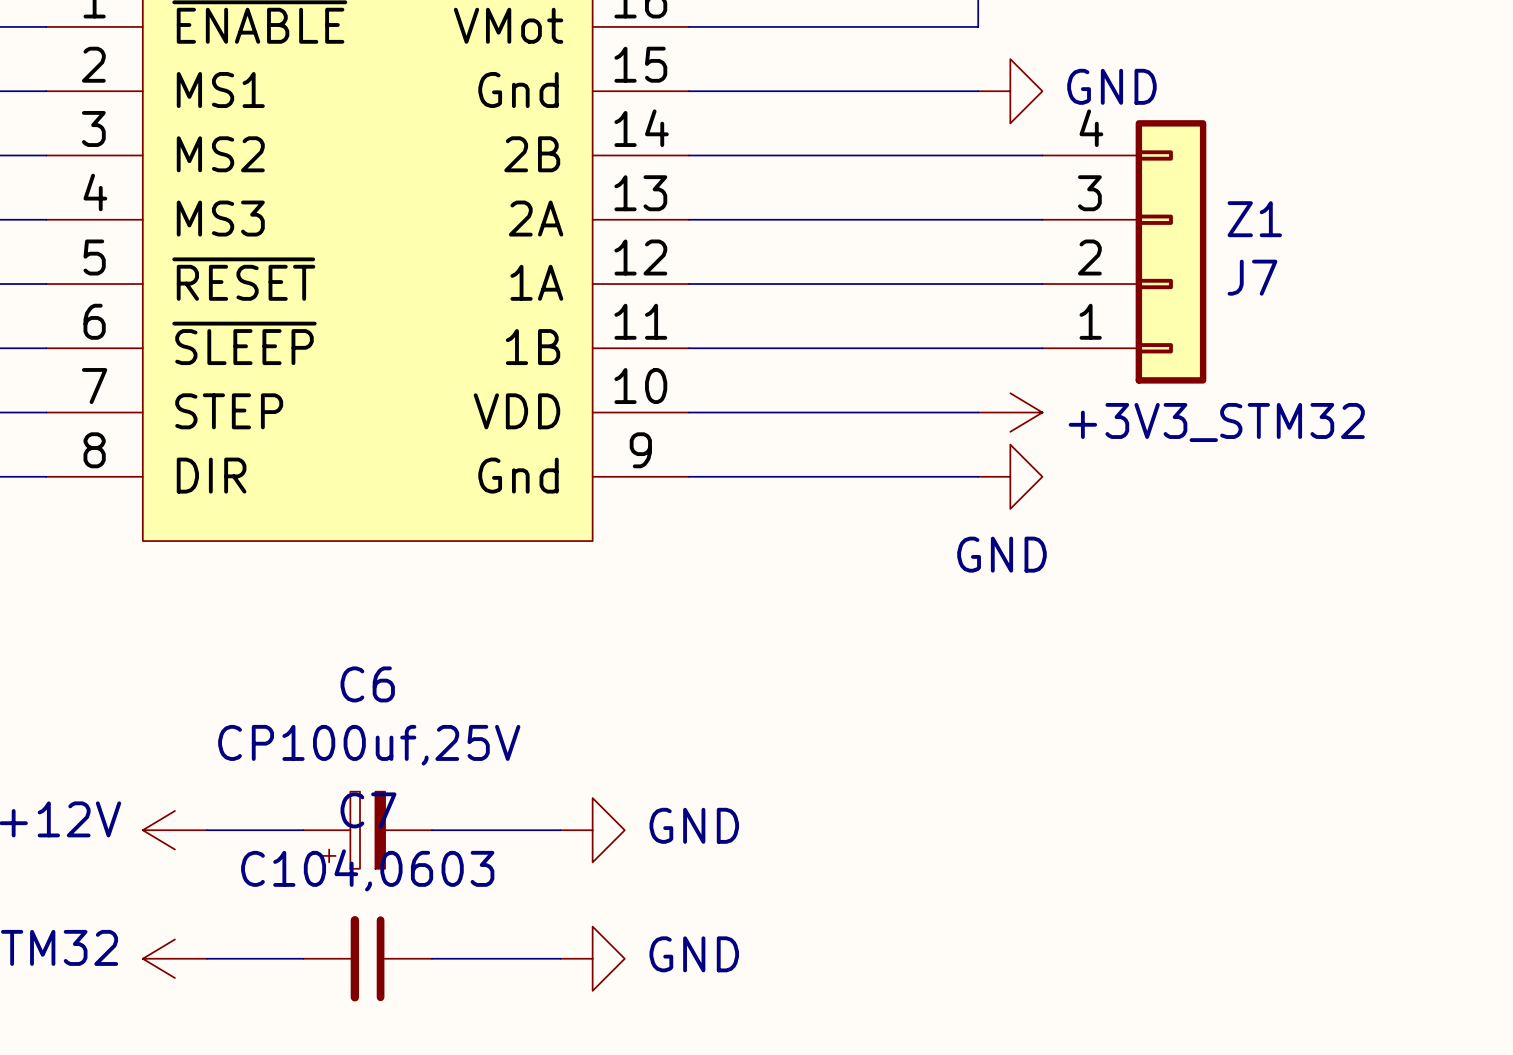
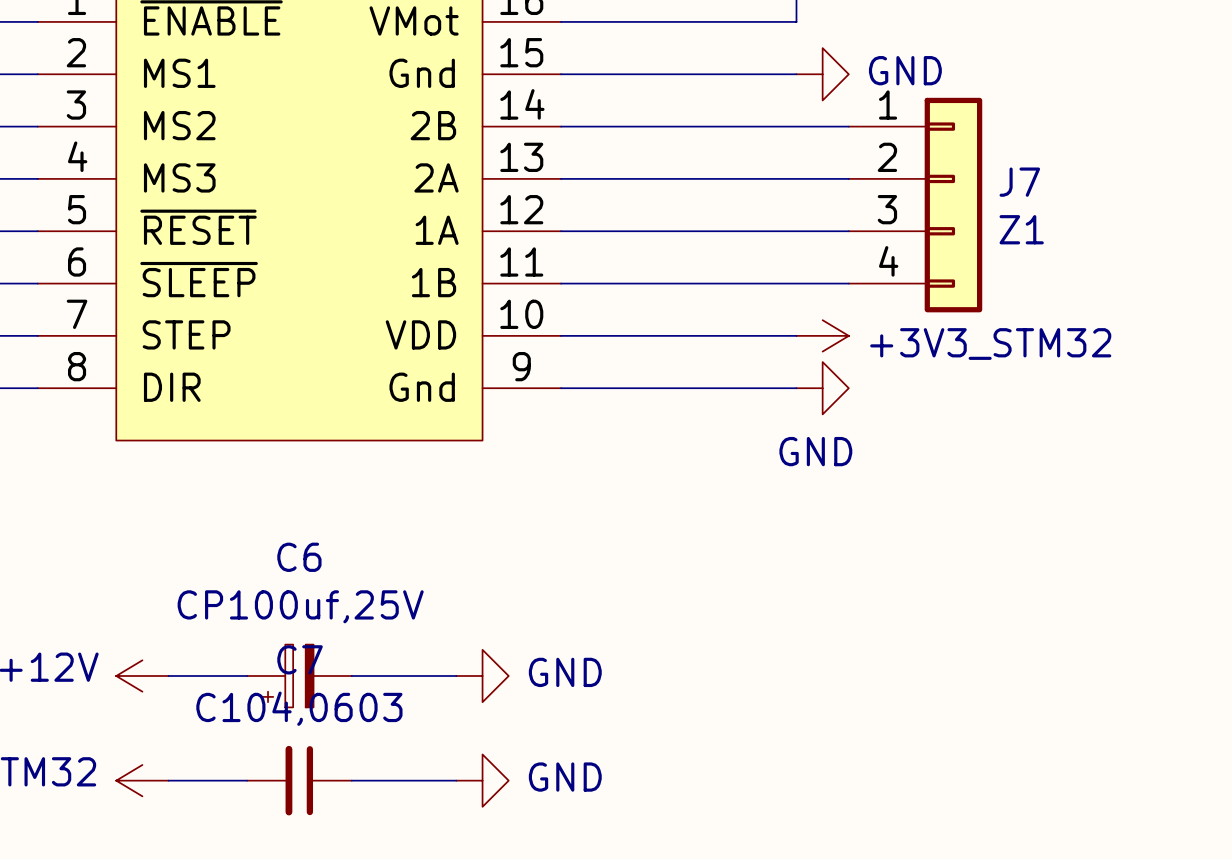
J7 flip: as is (1170, 251) -> up-down (953, 205)

